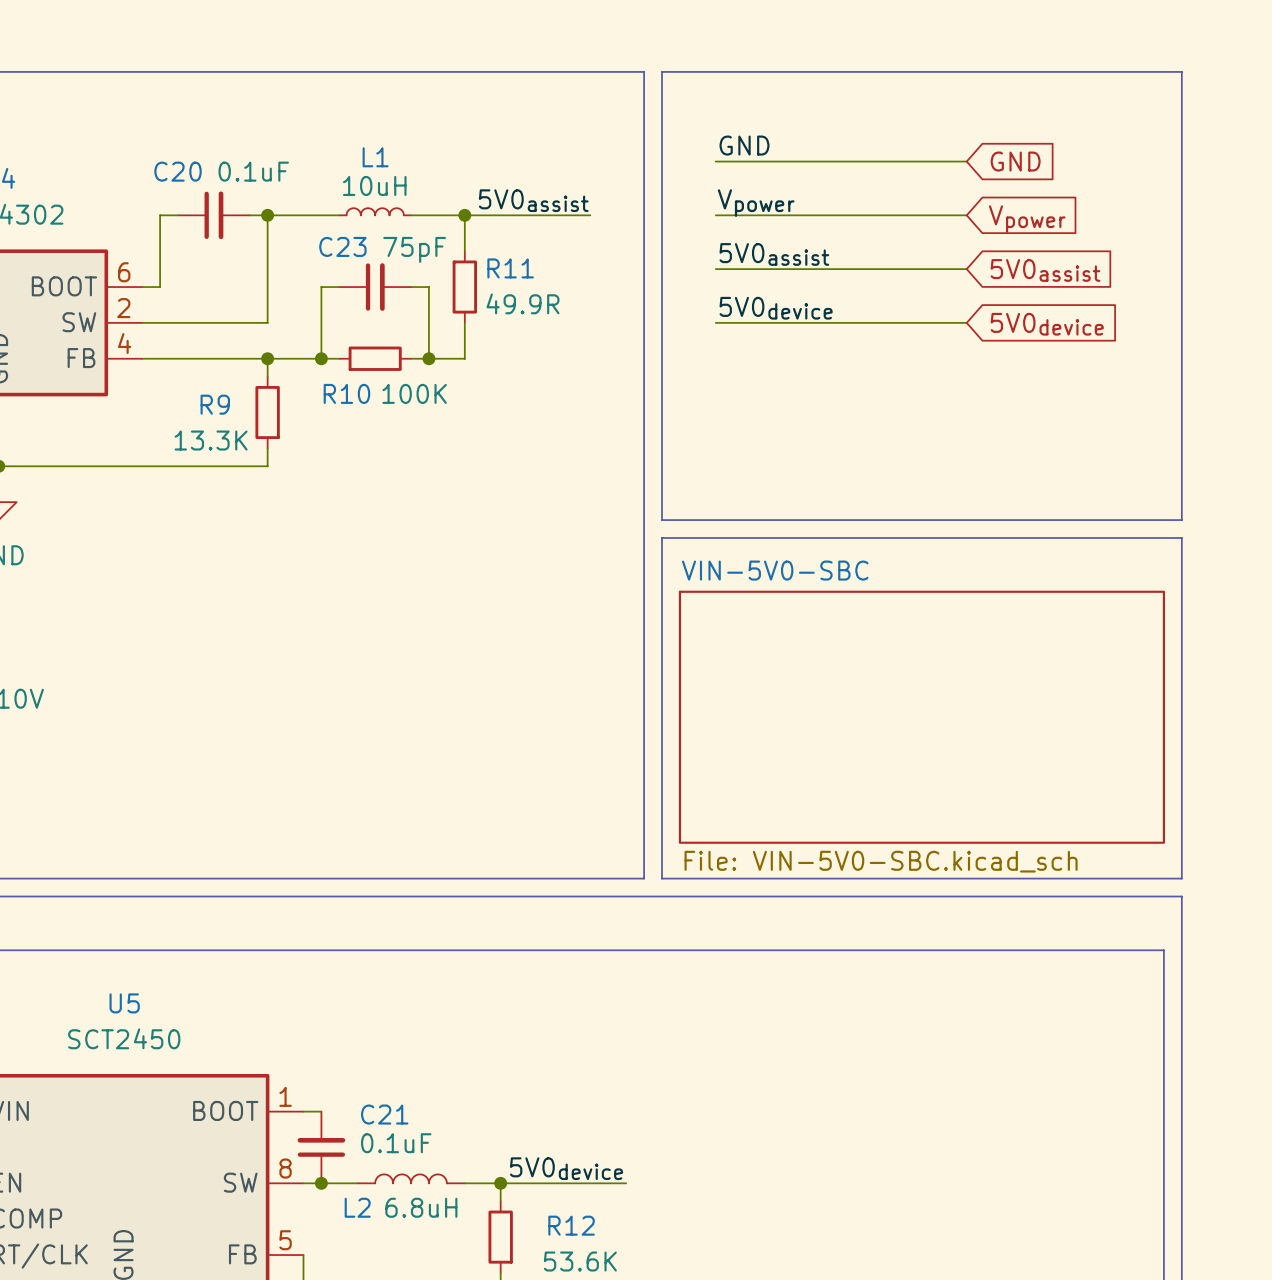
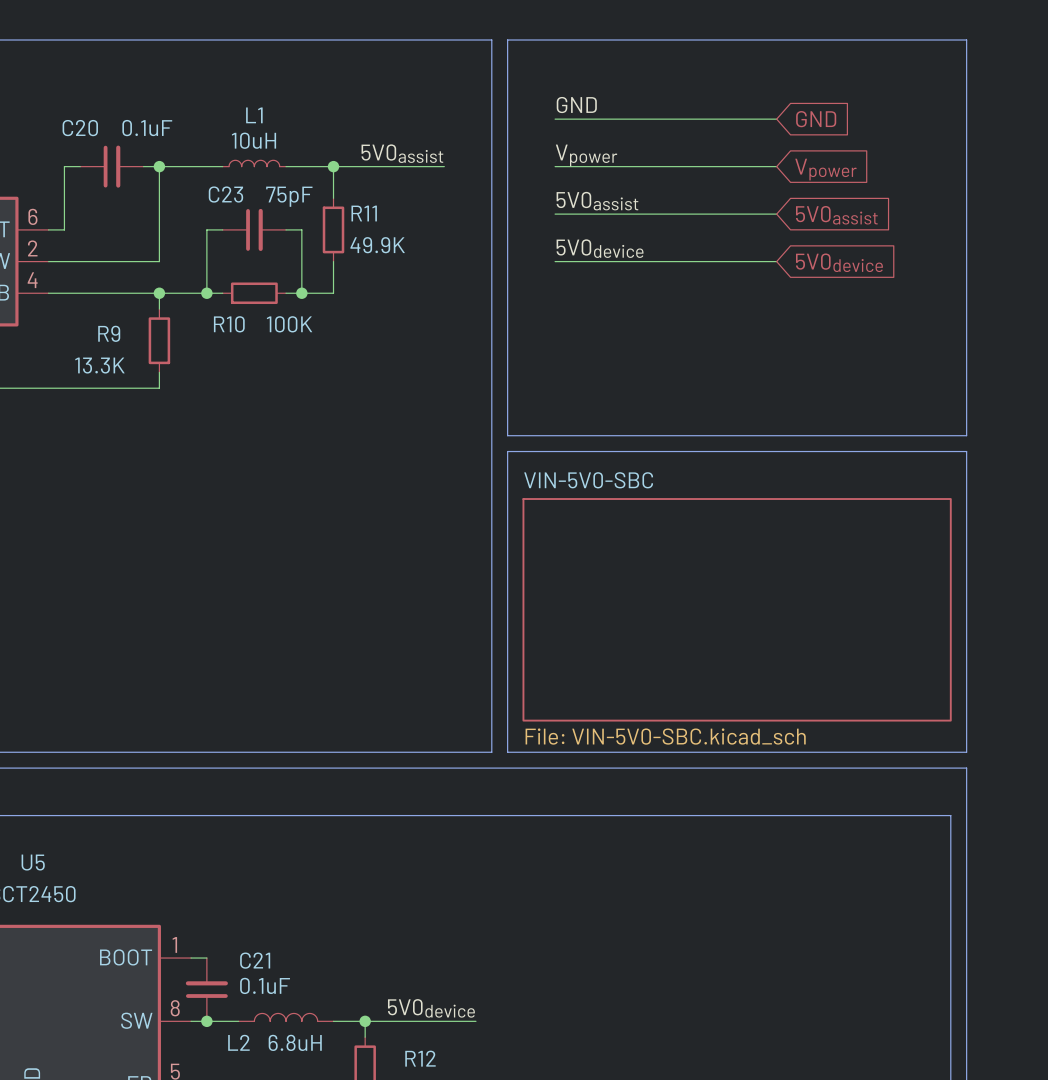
R11 value: 49.9R (522, 303) -> 49.9K (377, 245)

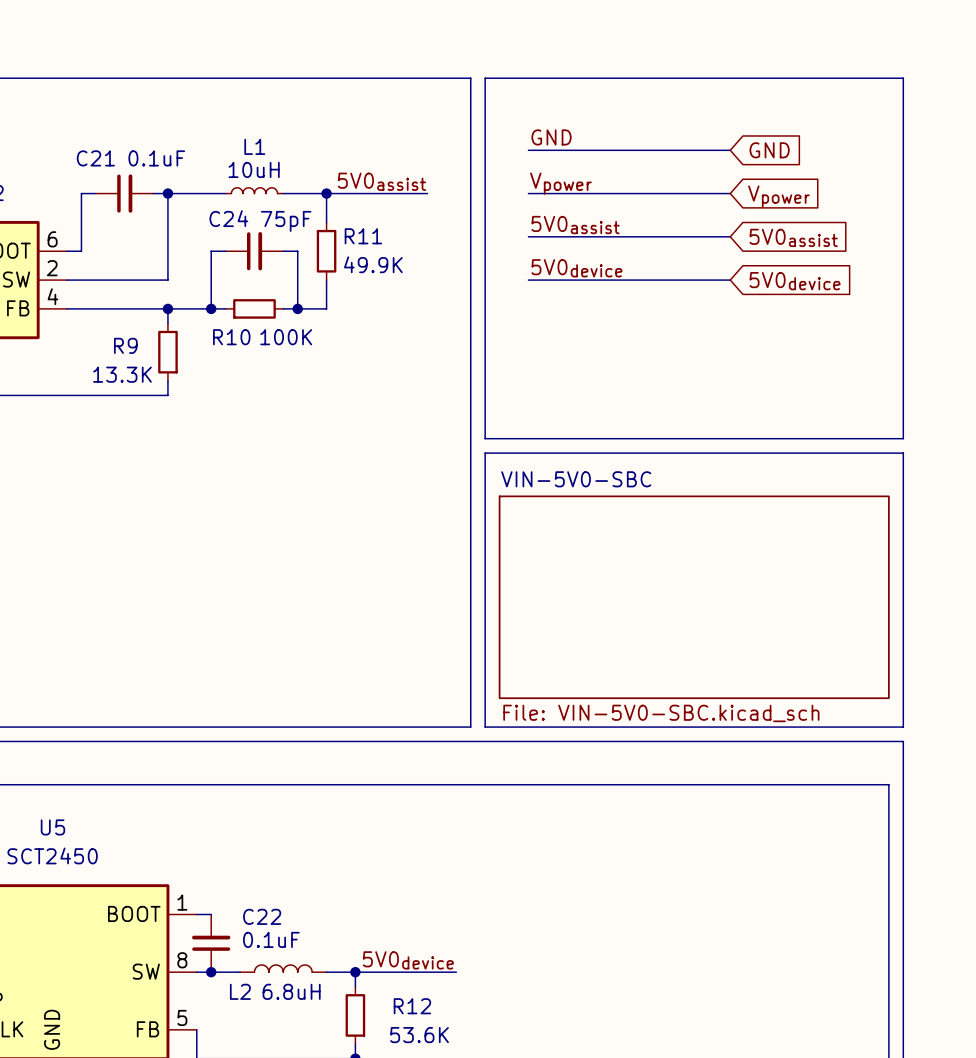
C20 name: C20 (80, 128) -> C21 (95, 158)
C23 name: C23 (225, 194) -> C24 (228, 218)
C21 name: C21 (255, 960) -> C22 (262, 916)

